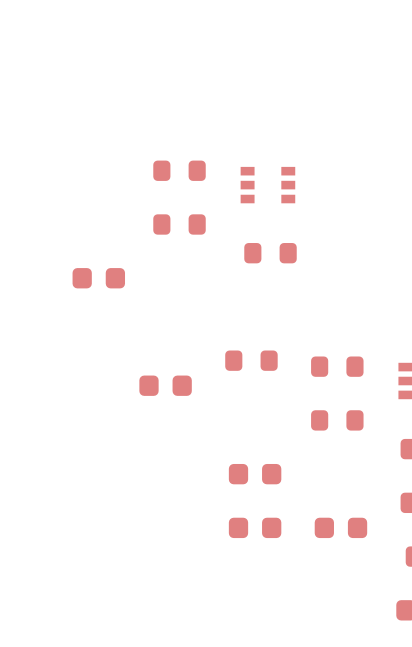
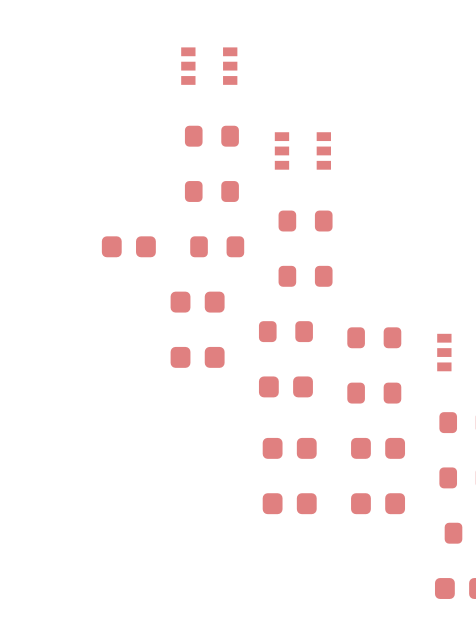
part: none -> (209, 66)
part: none -> (217, 246)
part: none -> (305, 276)
part: none -> (197, 302)
part: none -> (285, 386)
part: none -> (378, 448)

